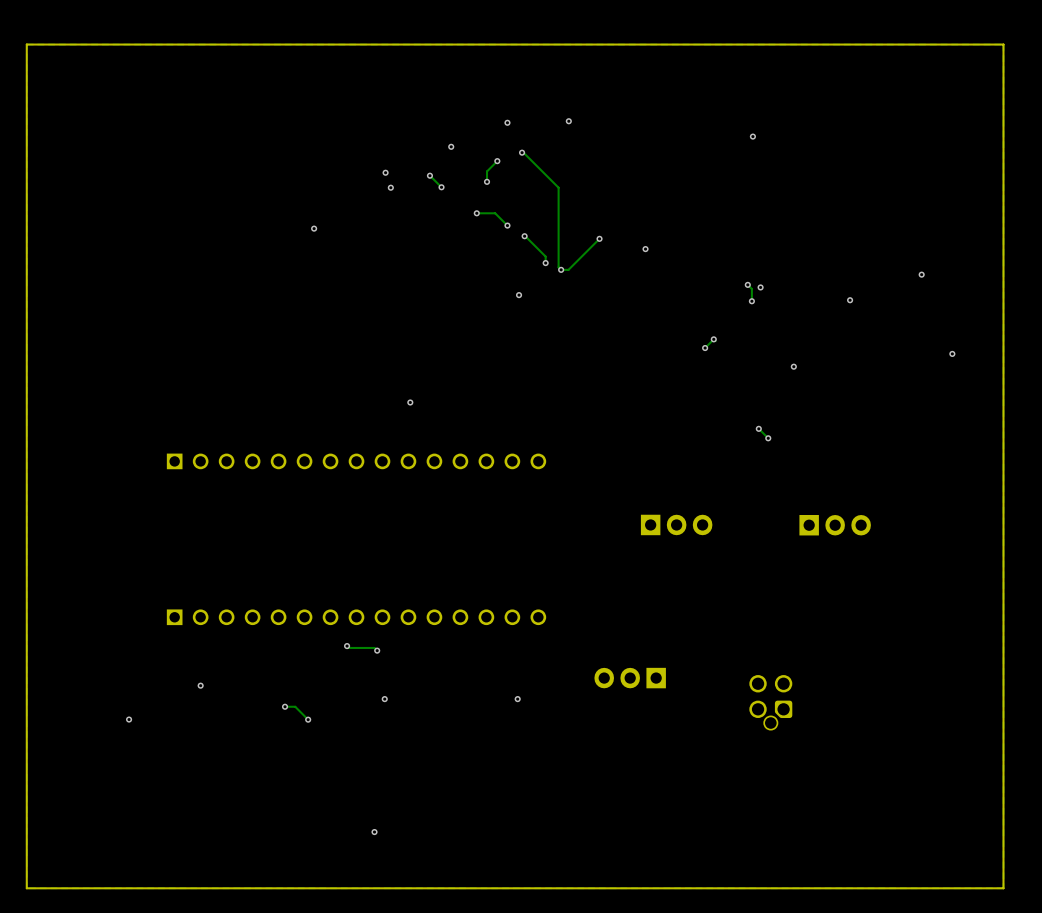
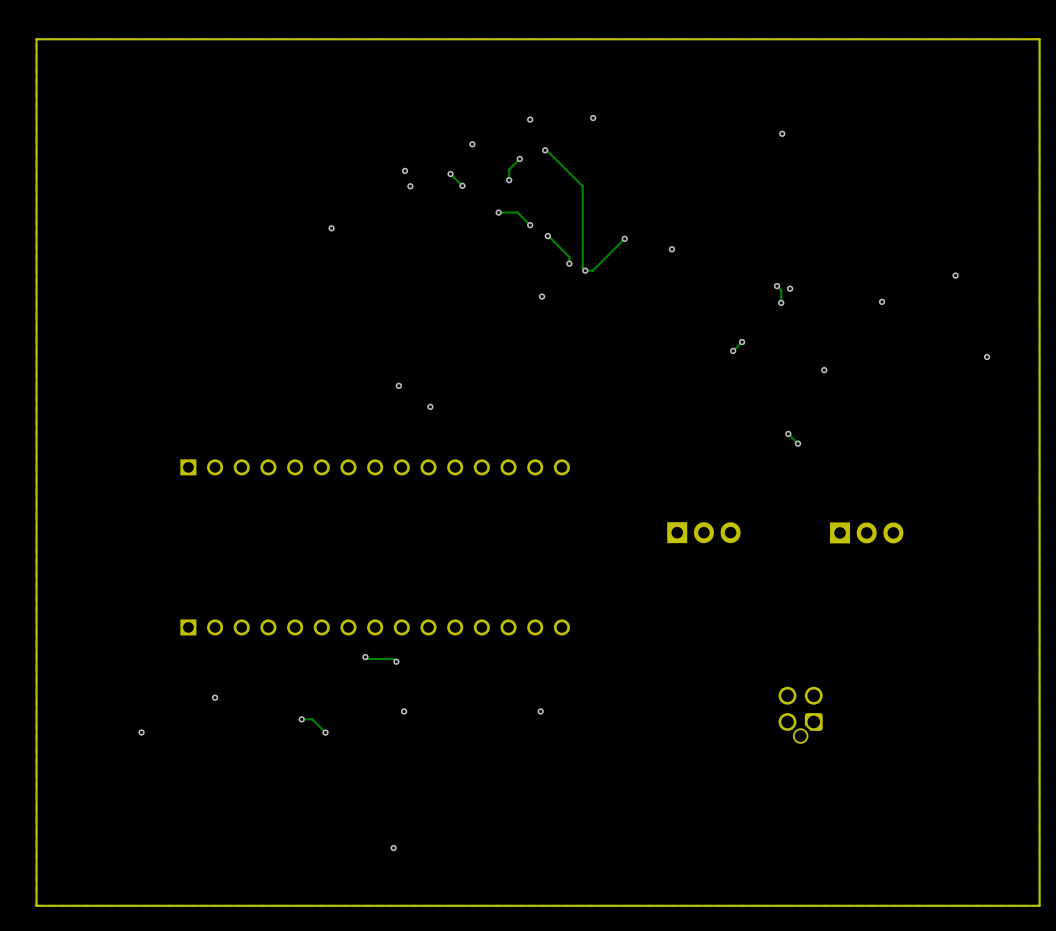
via: none -> (398, 385)
part: (630, 678) -> none

